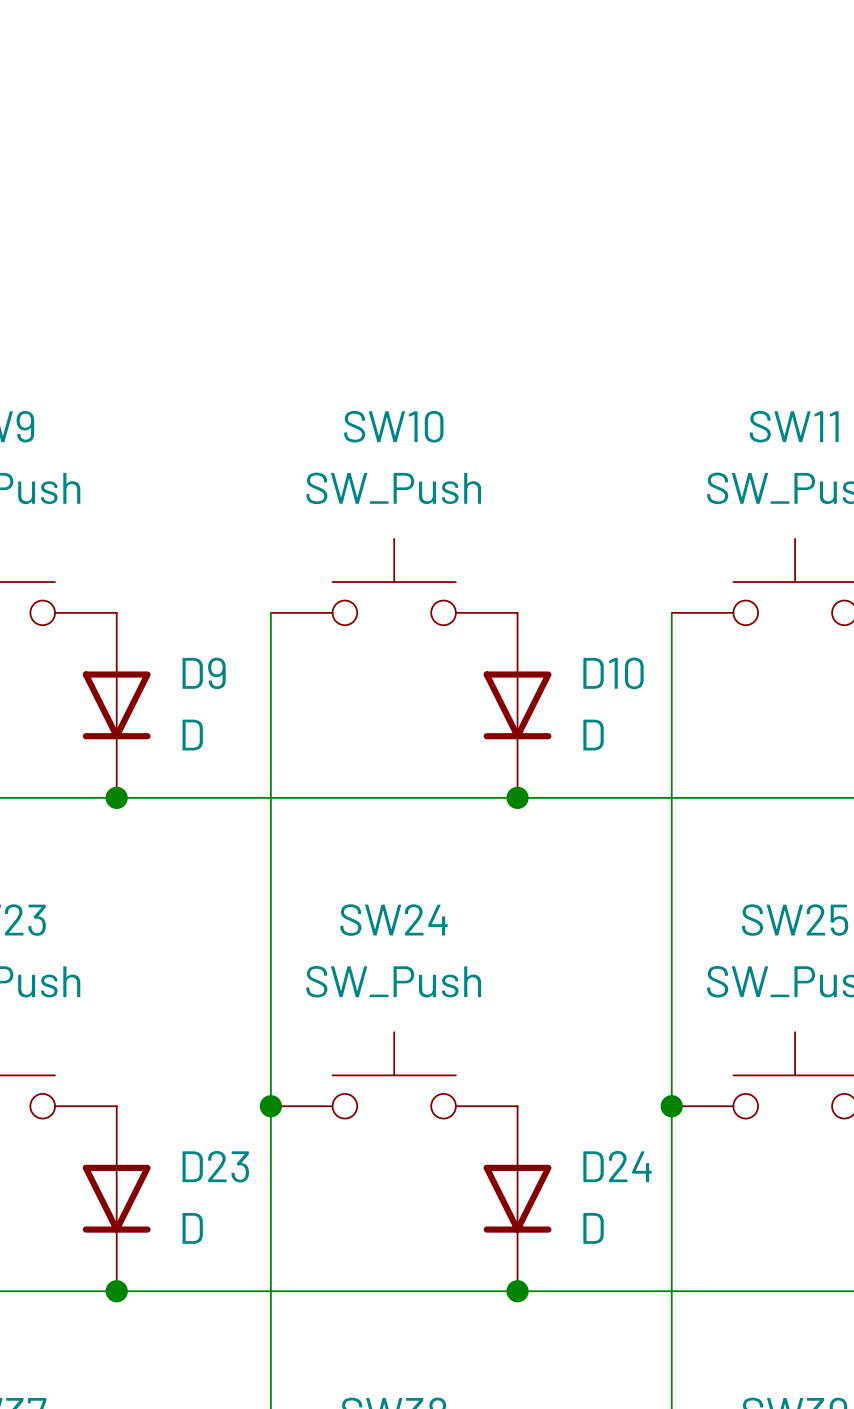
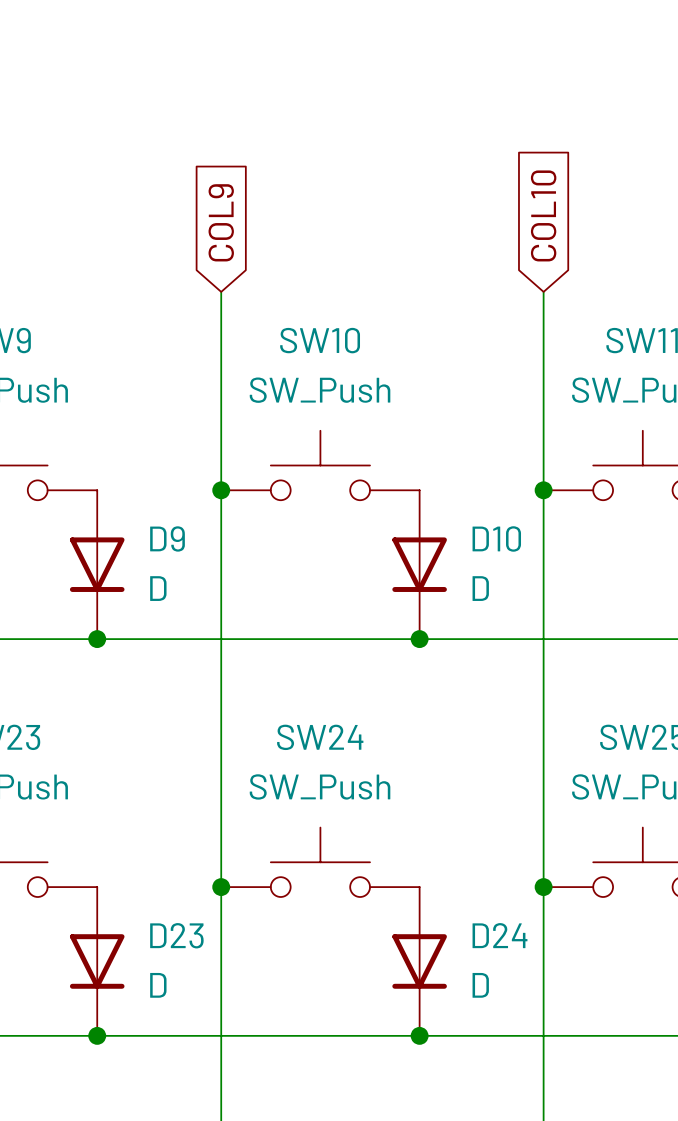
global label: none -> COL10 (543, 215)
global label: none -> COL9 (221, 222)
wire: none -> (221, 291) (221, 490)
wire: none -> (543, 291) (543, 490)
junction: none -> (221, 490)
junction: none -> (543, 490)

